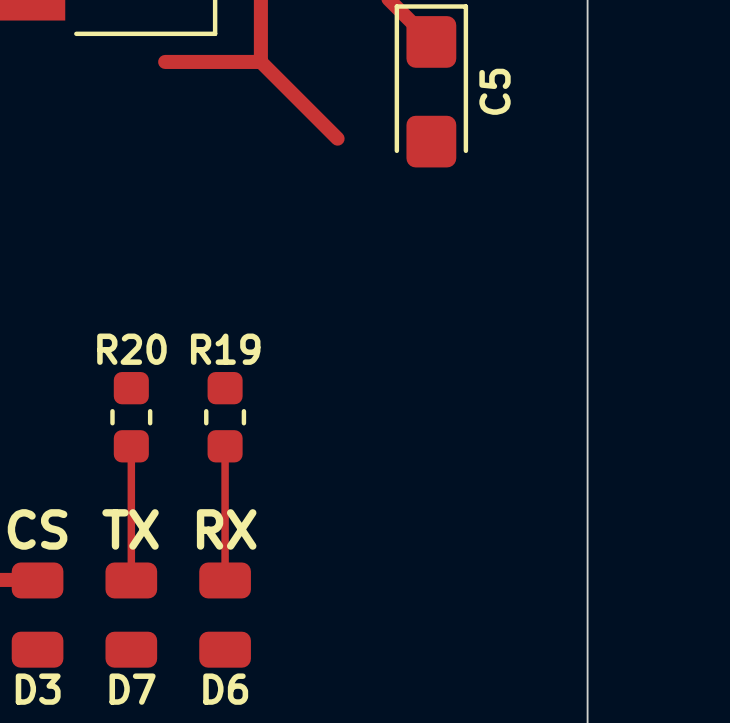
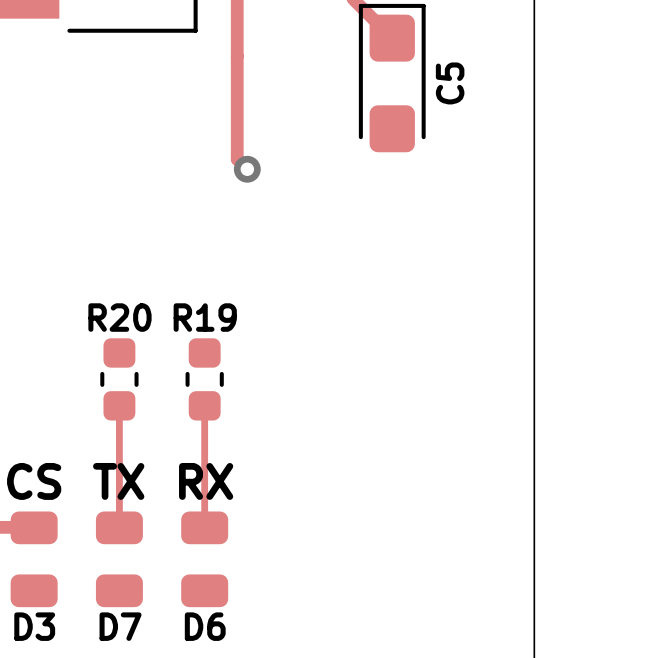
track: (165, 61) (260, 61) (337, 138) -> none
track: none -> (237, 56) (237, 159) (247, 169)
via: none -> (247, 169)

